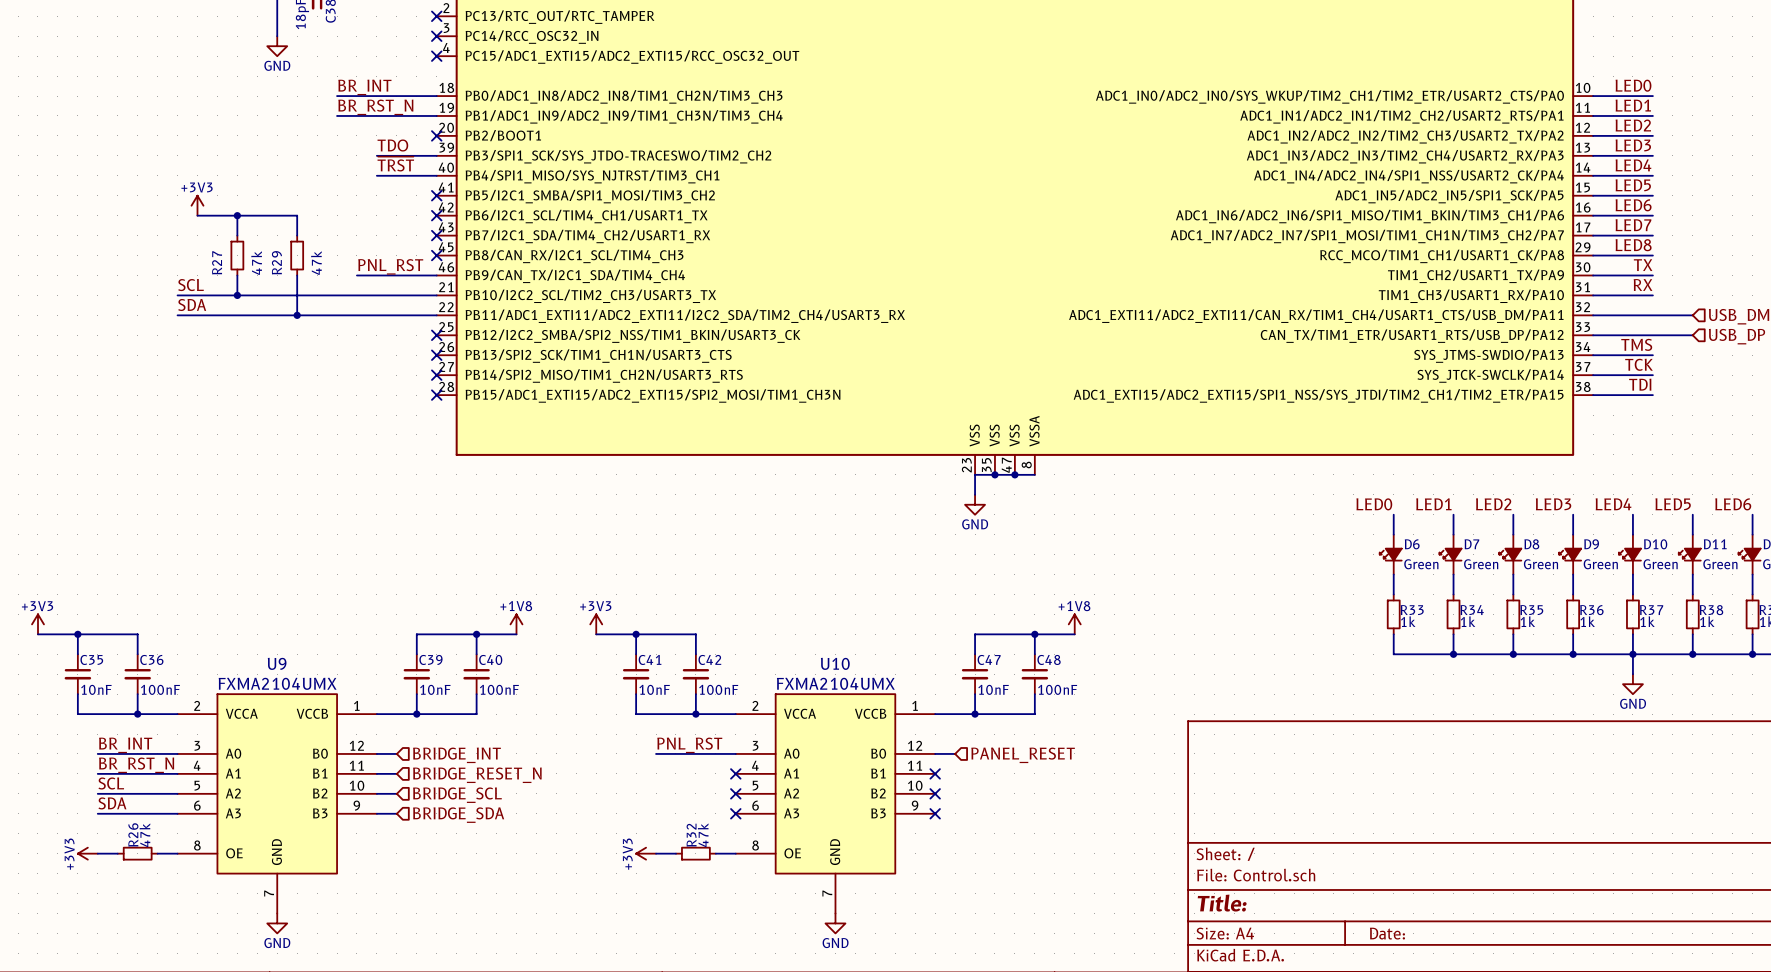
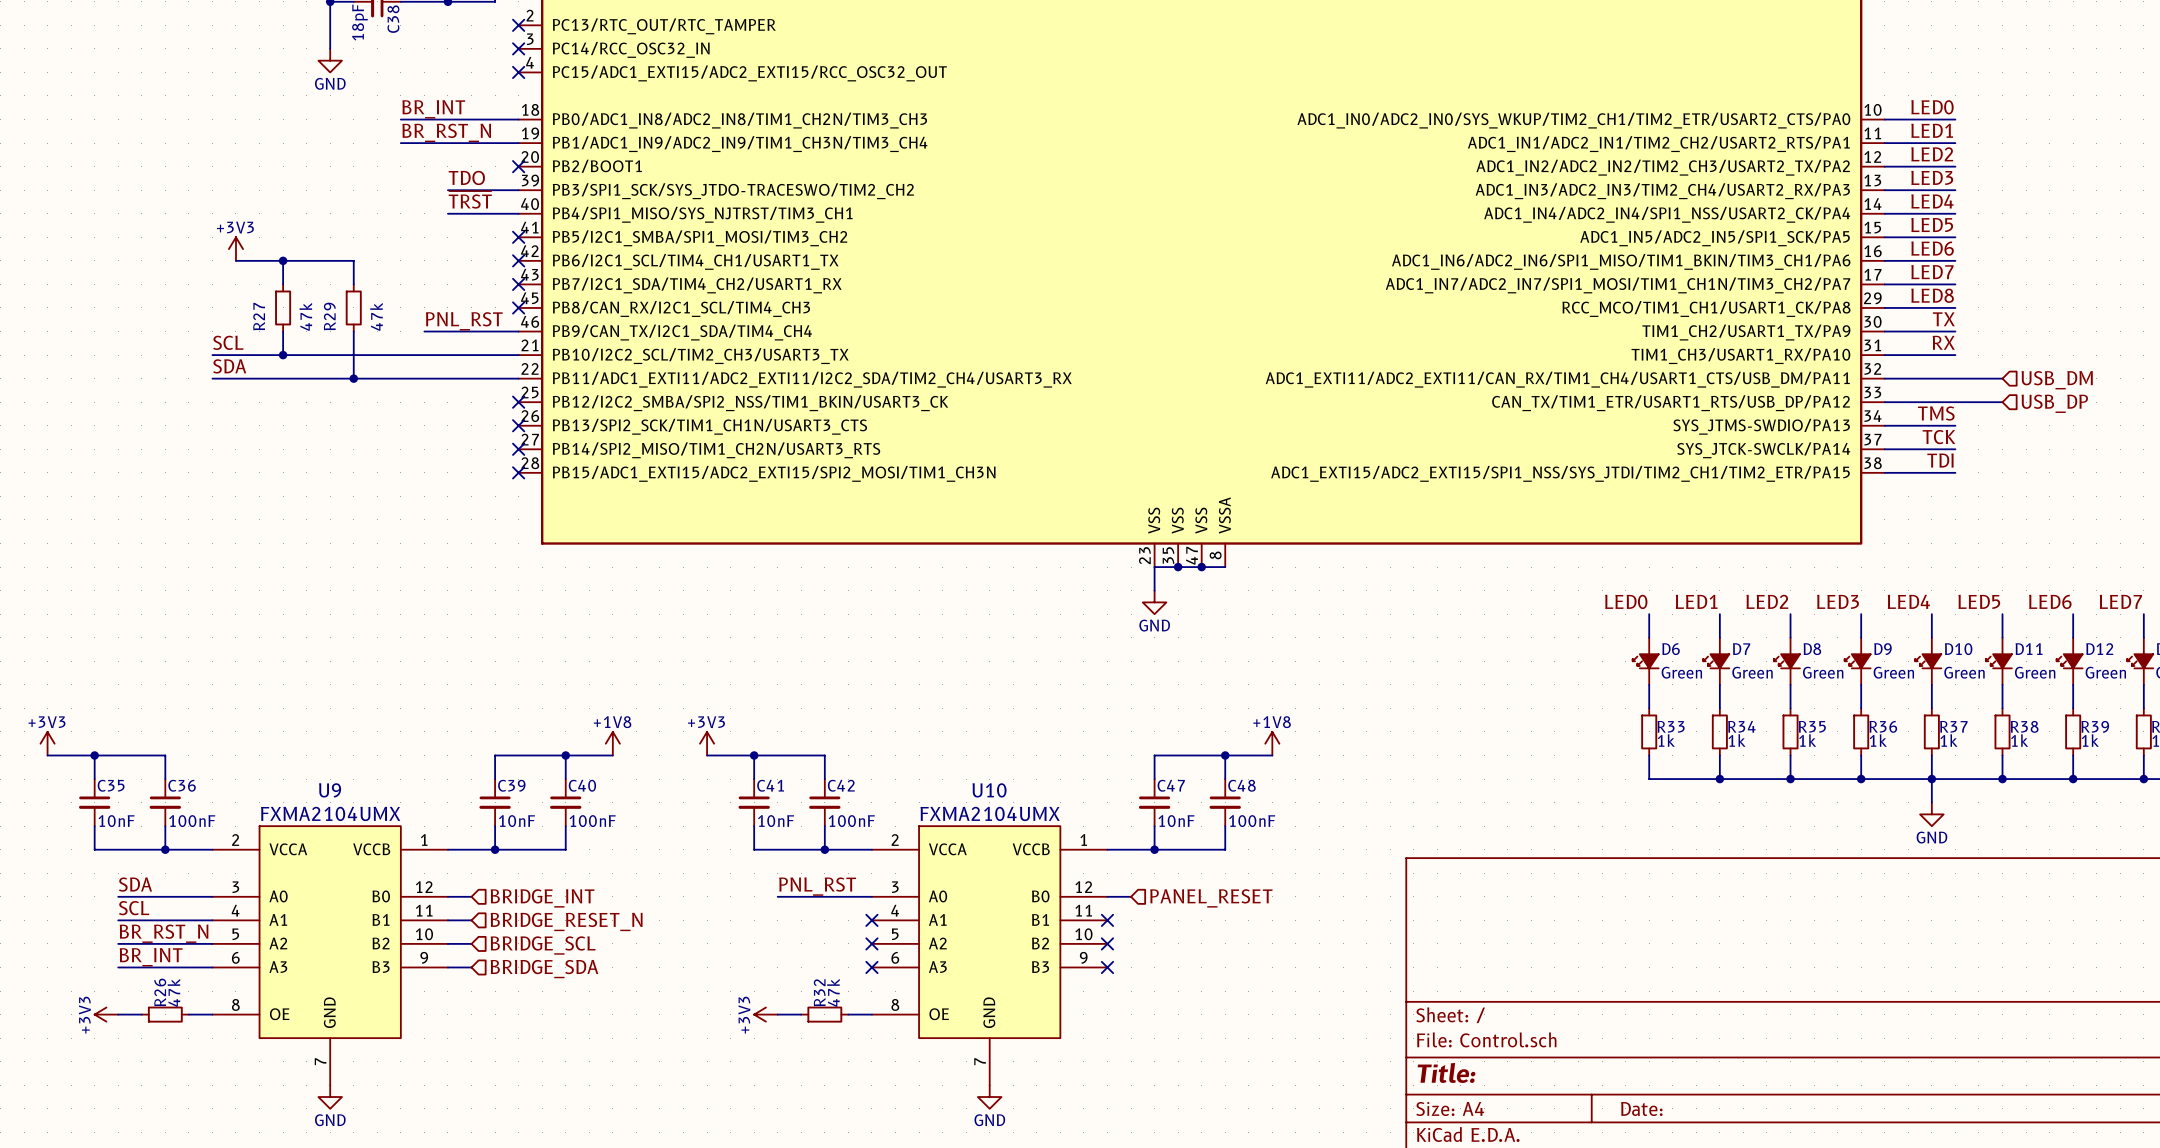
label: BR_INT (125, 745) -> SDA (135, 884)
label: BR_RST_N (136, 765) -> SCL (134, 908)
label: SCL (111, 783) -> BR_RST_N (164, 933)
label: SDA (112, 803) -> BR_INT (151, 957)

